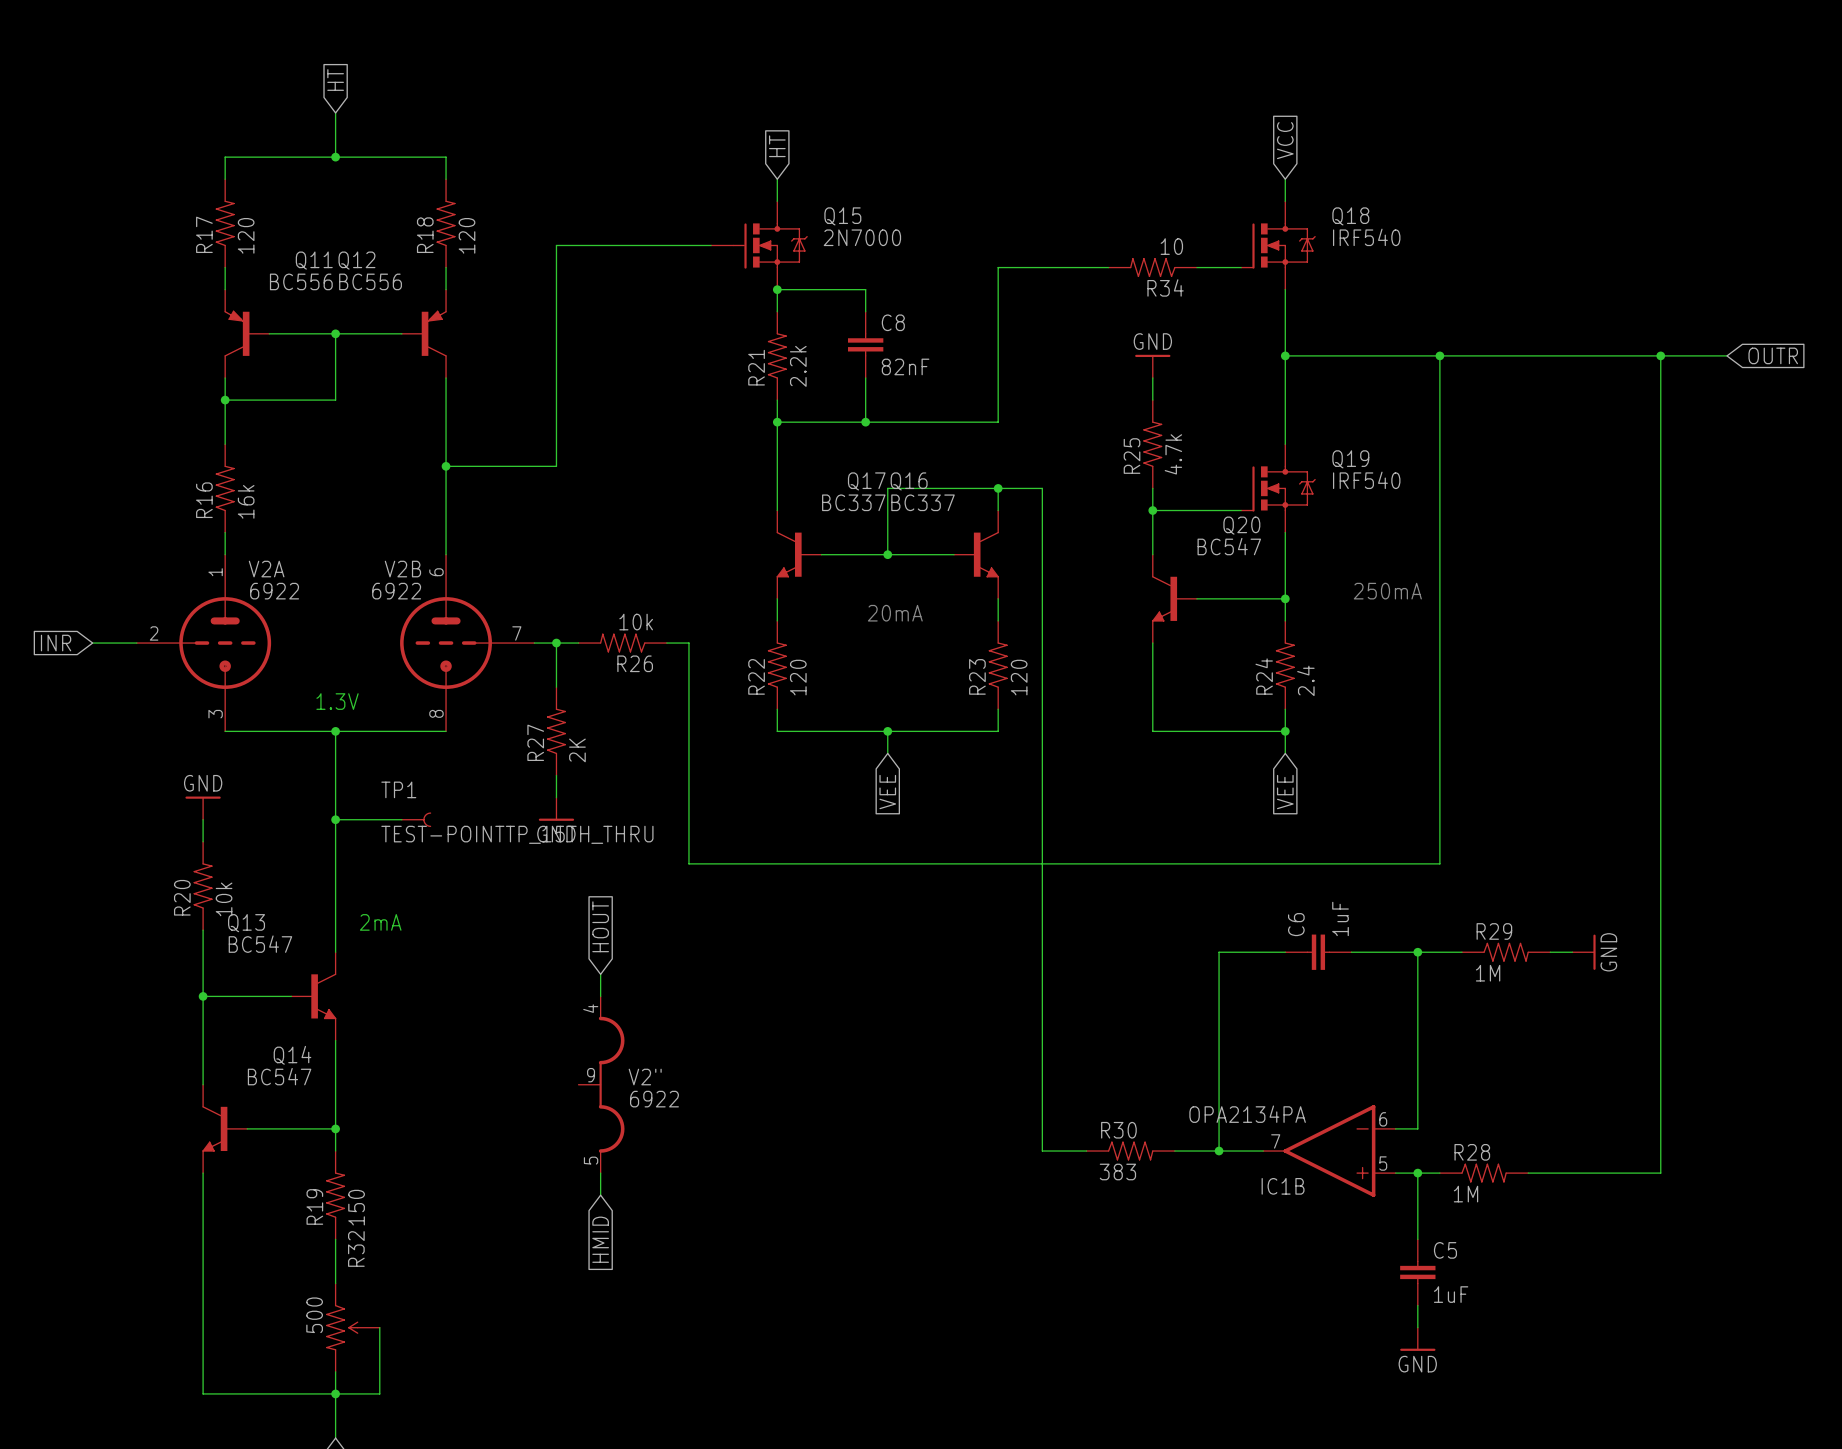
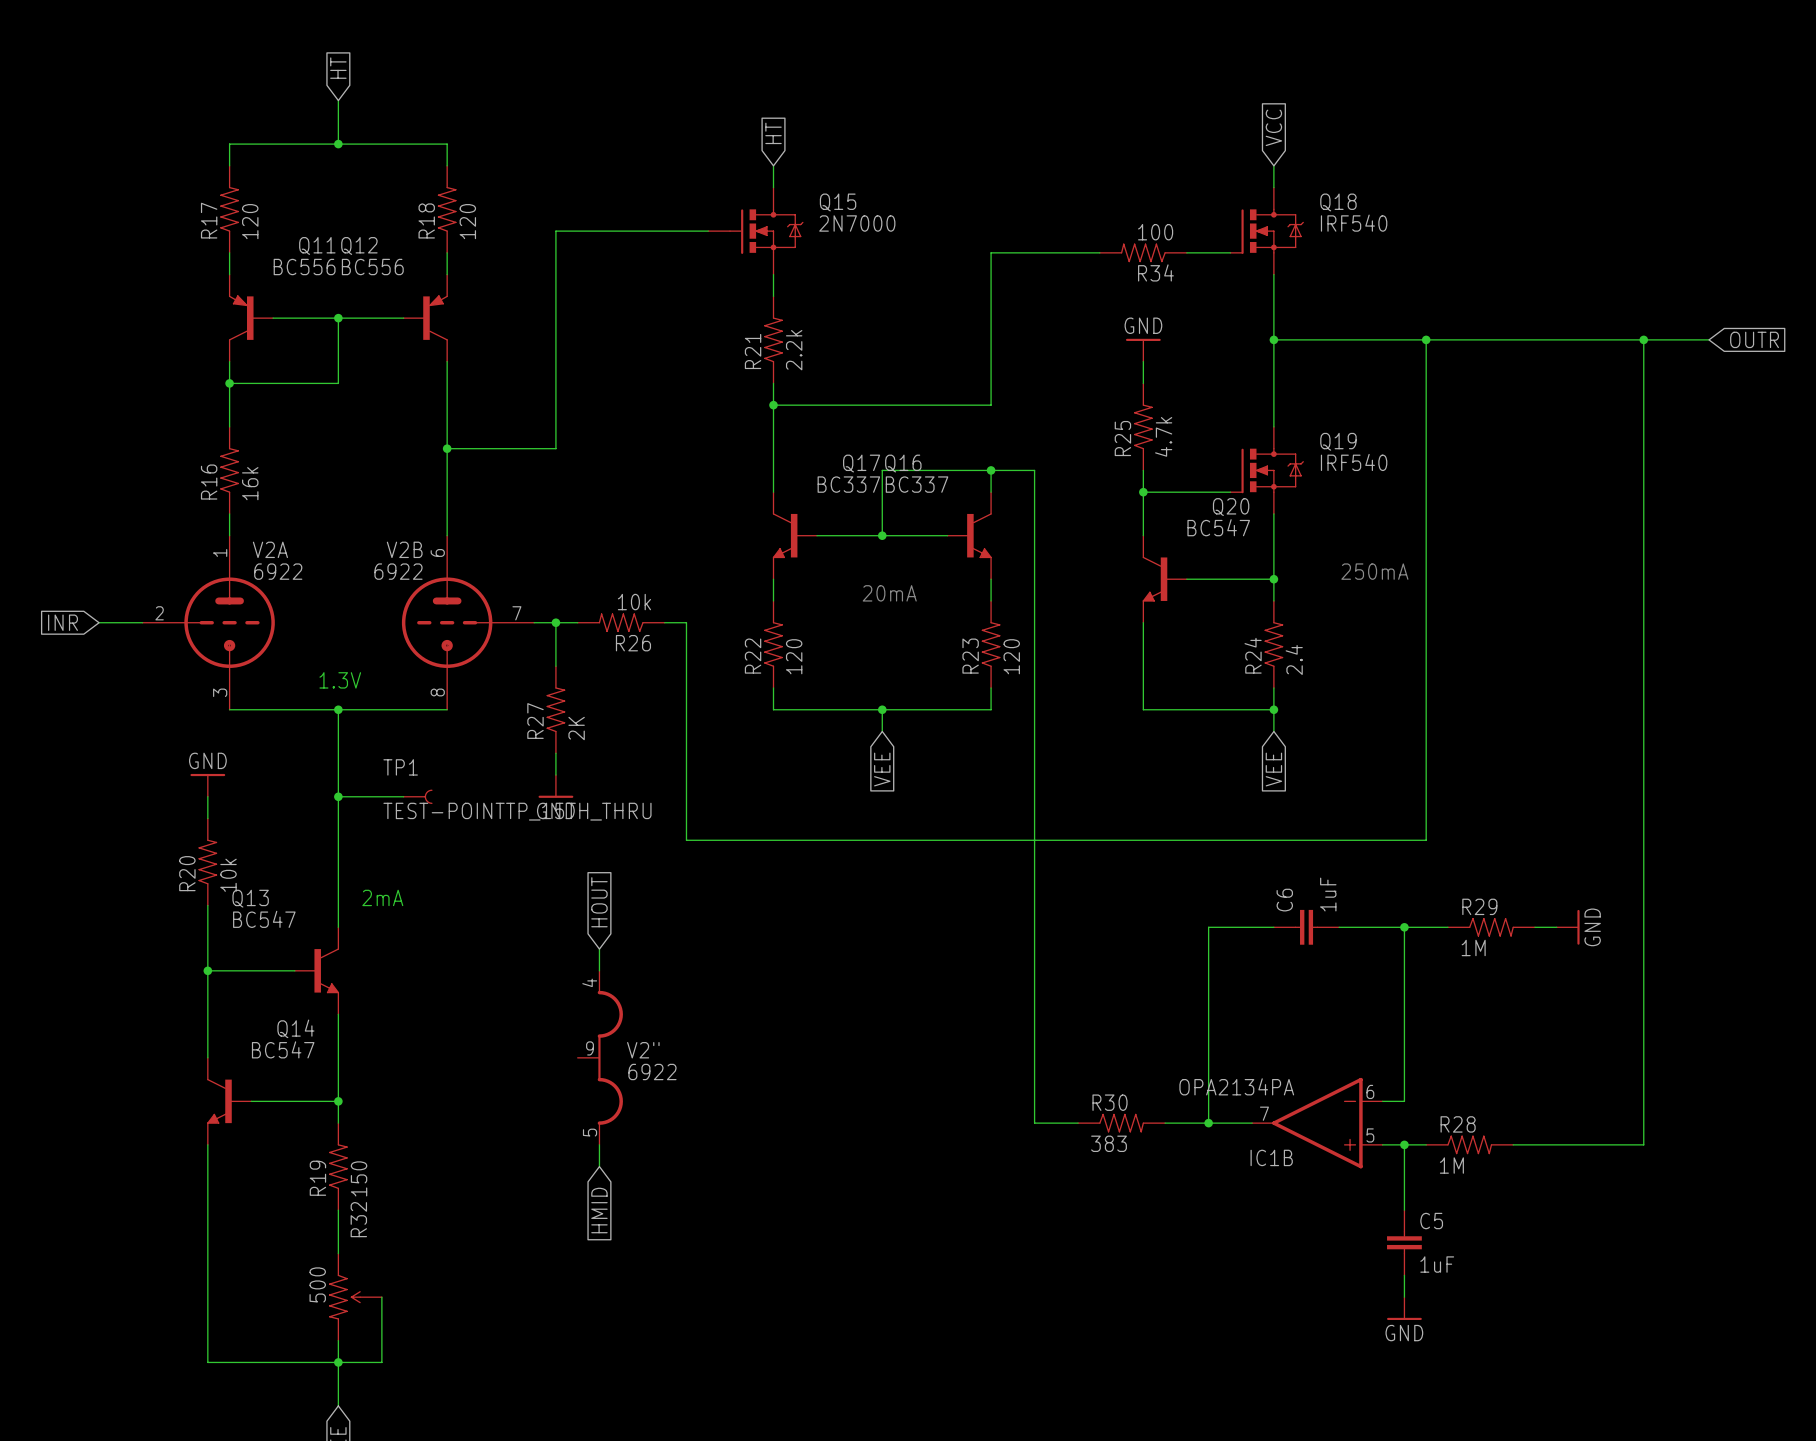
R34 value: 10 (1171, 246) -> 100 (1155, 232)
wire: (777, 289) (865, 289) (865, 311) -> none
junction: (777, 289) -> none
C8: 82nF (865, 344) -> none
wire: (865, 378) (865, 422) -> none
junction: (865, 422) -> none

